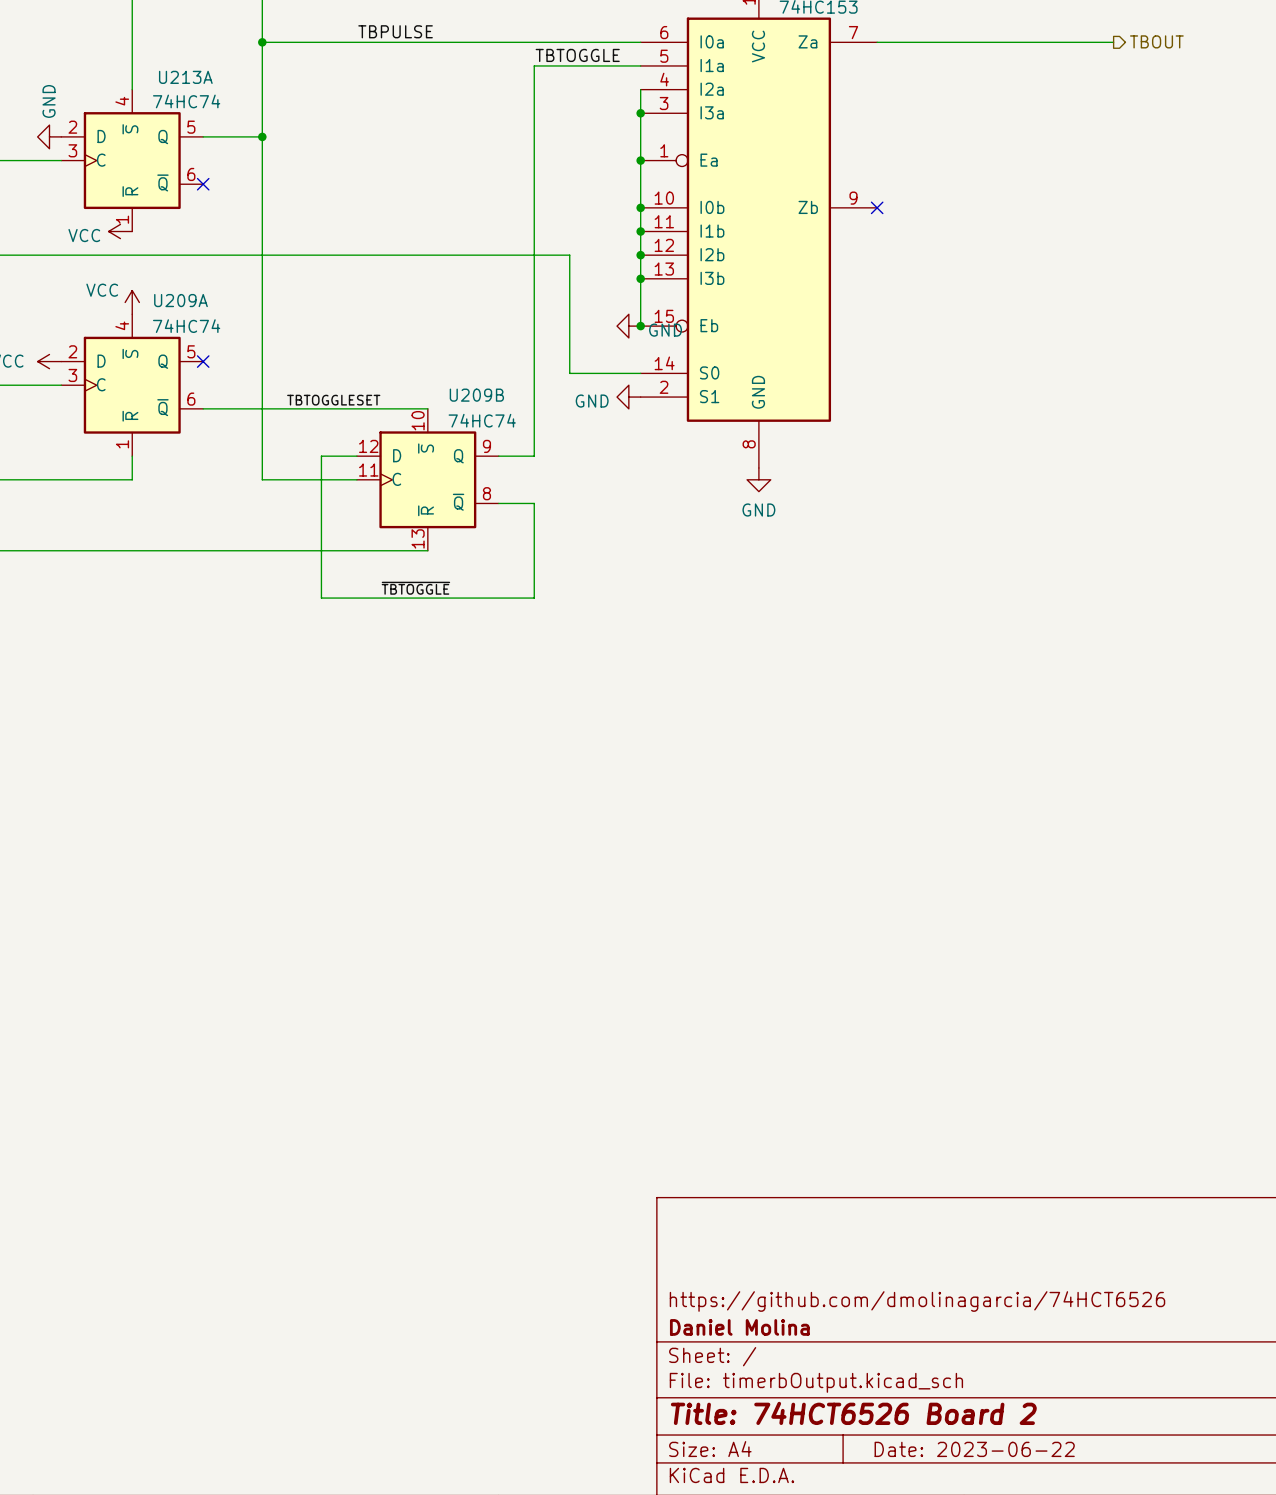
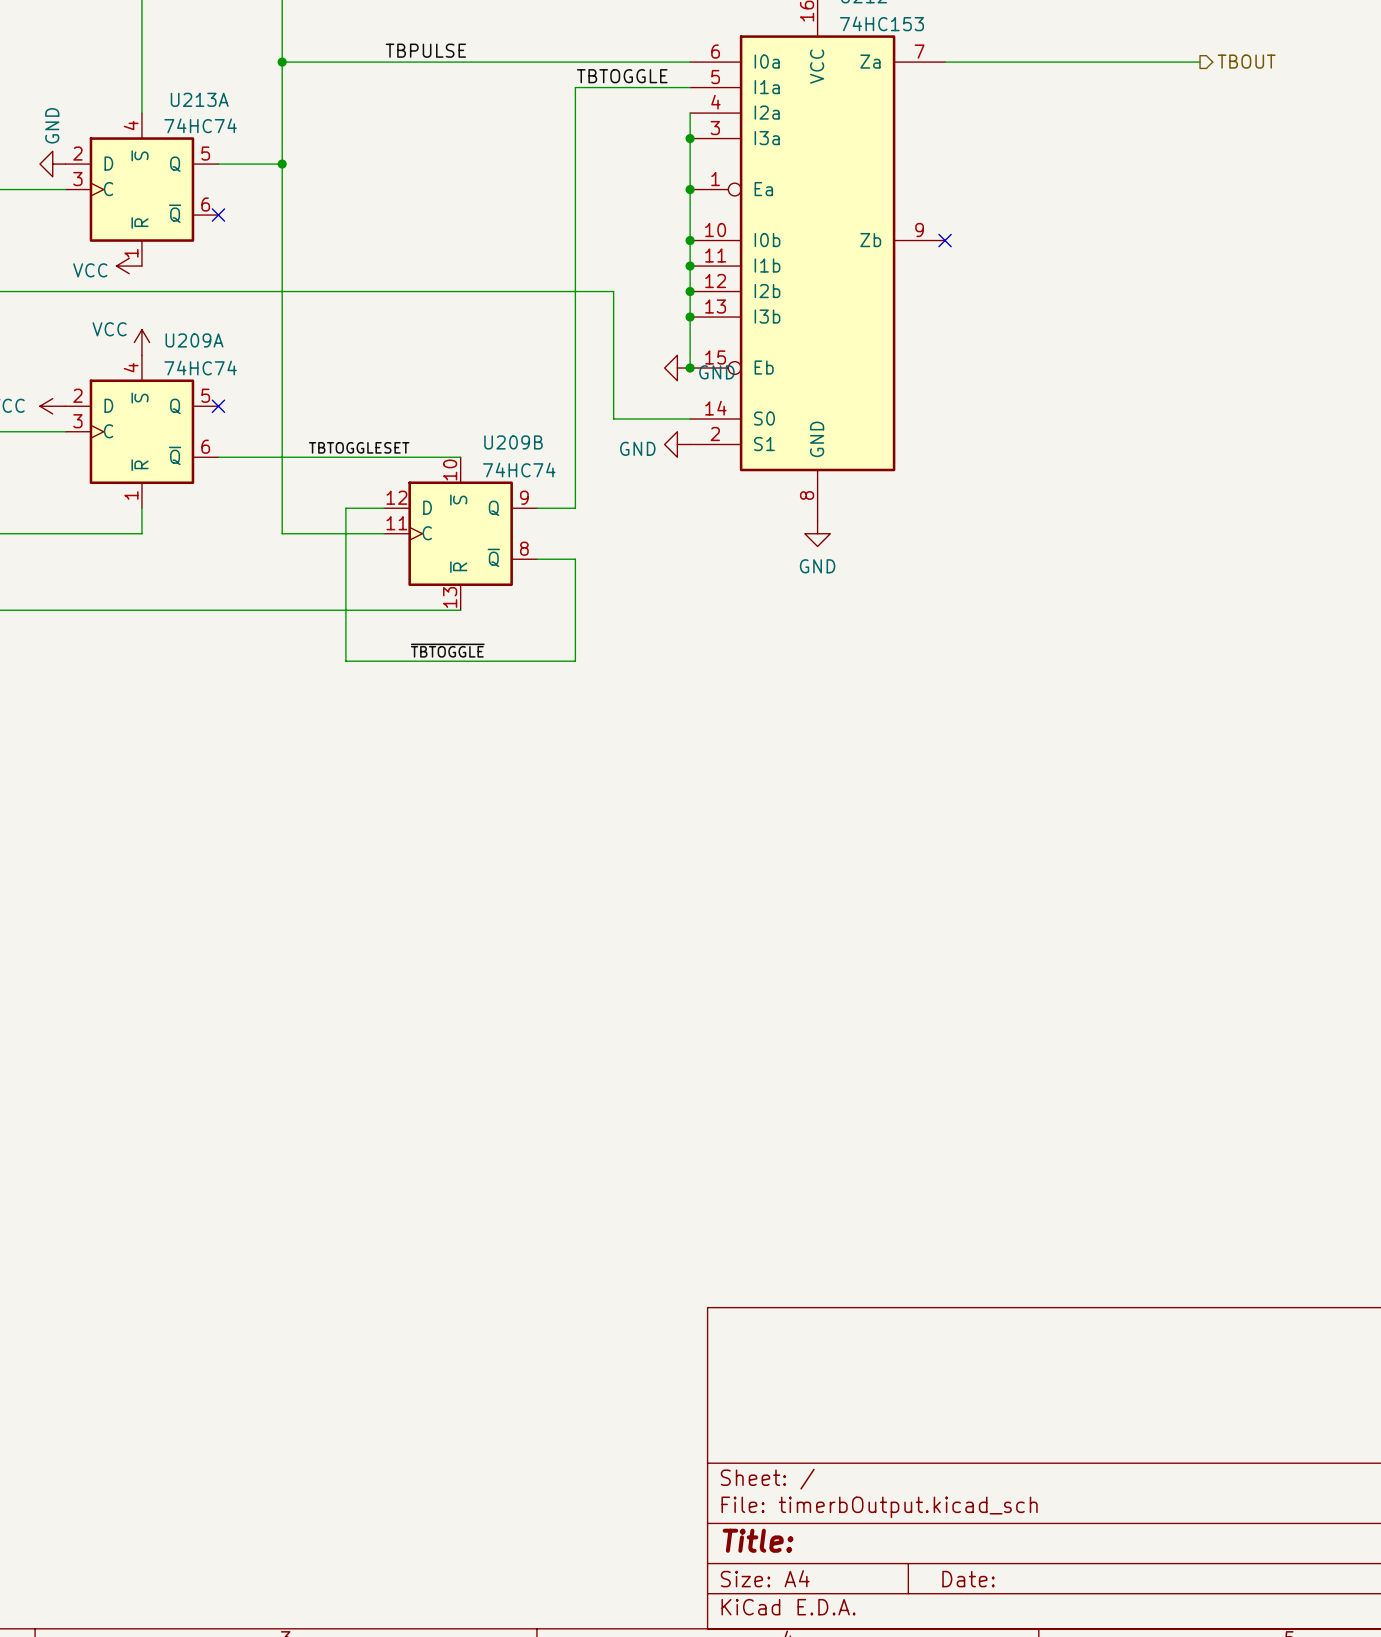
title block: https://github.com/dmolinagarcia/74HCT6526 (917, 1301) -> none
title block: Daniel Molina (739, 1327) -> none
title block: Title: 74HCT6526 Board 2 (853, 1413) -> Title: (758, 1540)
title block: Date: 2023-06-22 (974, 1449) -> Date: (968, 1579)

